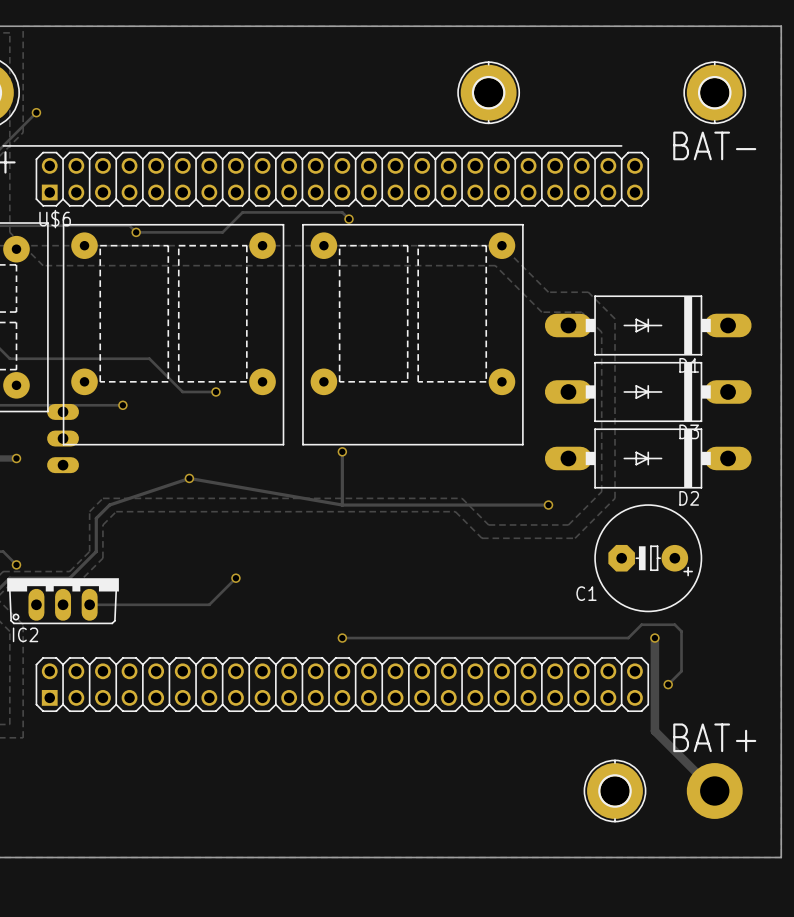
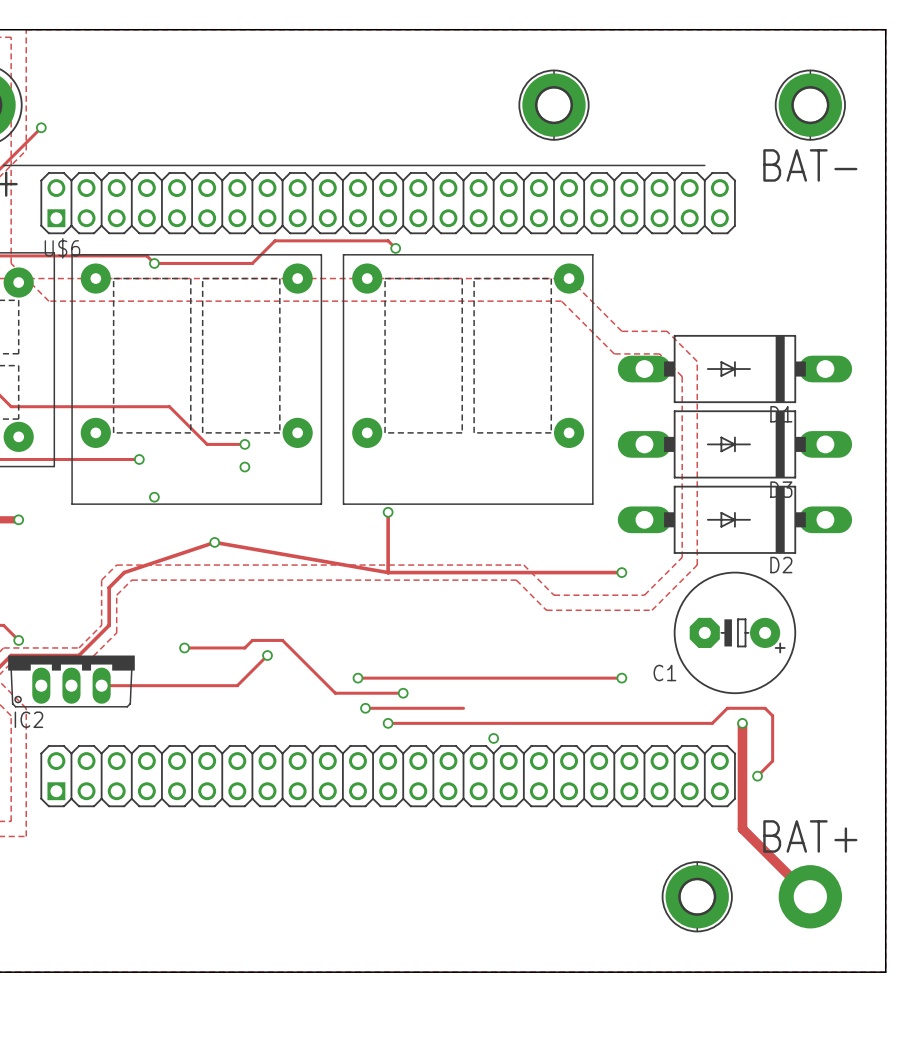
via: none -> (244, 467)
part: (63, 438) -> none
via: none -> (154, 497)
track: none -> (184, 647) (244, 647) (252, 640) (282, 640) (335, 693) (403, 693)
via: none -> (184, 647)
track: none -> (357, 678) (621, 678)
via: none -> (357, 678)
via: none -> (621, 678)
via: none -> (403, 693)
track: none -> (365, 708) (463, 708)
via: none -> (365, 708)
via: none -> (493, 738)

